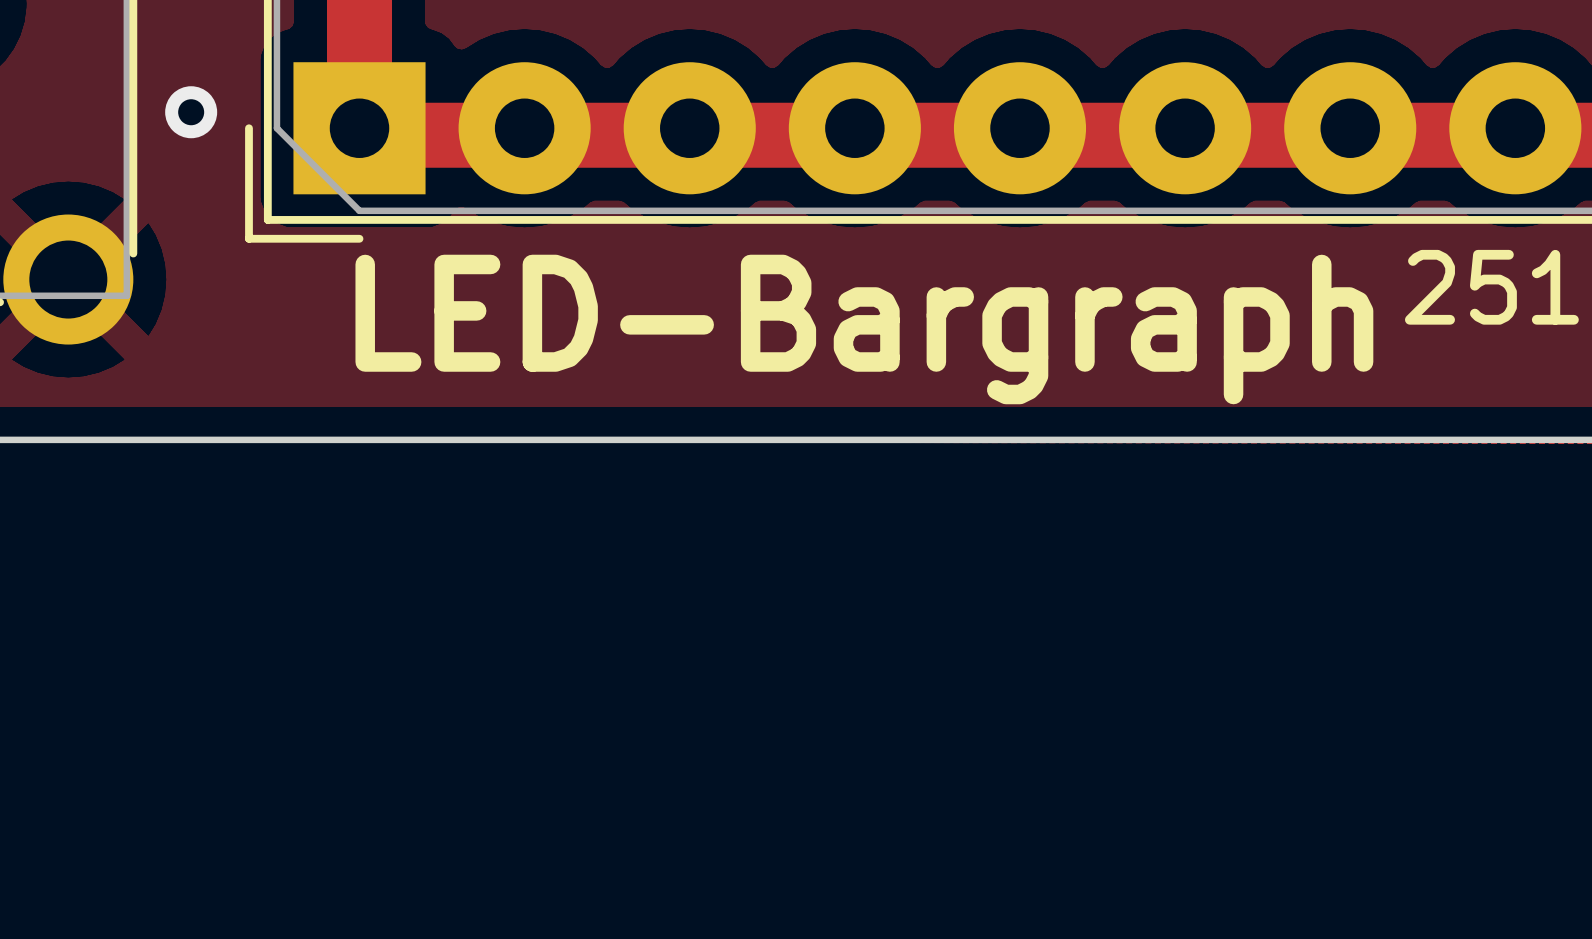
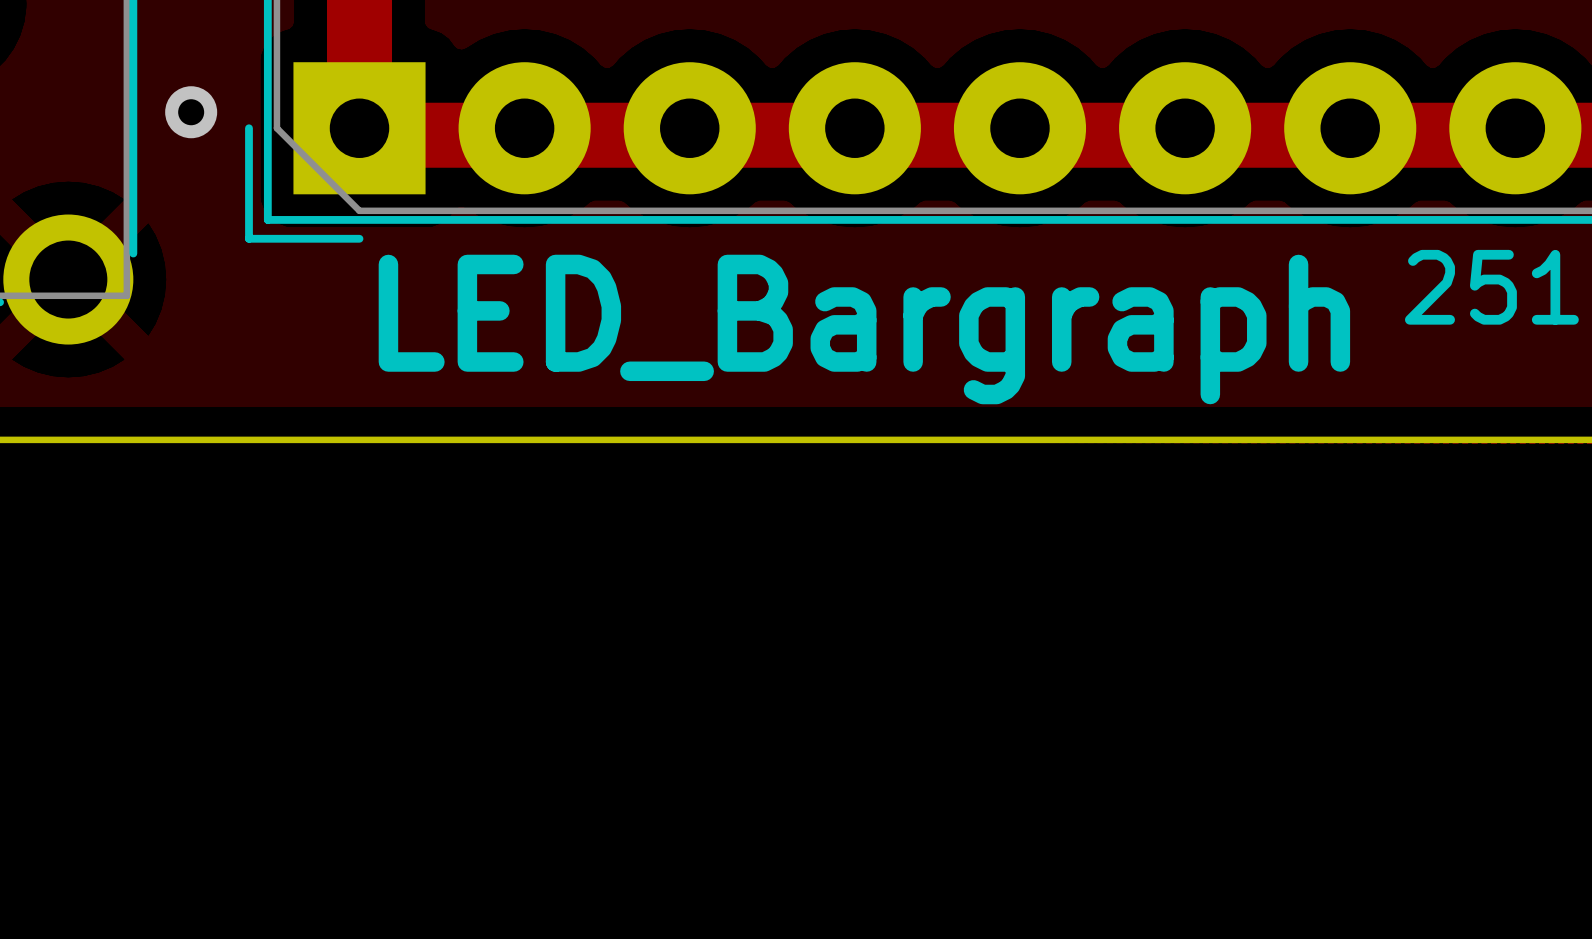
text: LED-Bargraph (864, 329) -> LED_Bargraph (864, 329)

